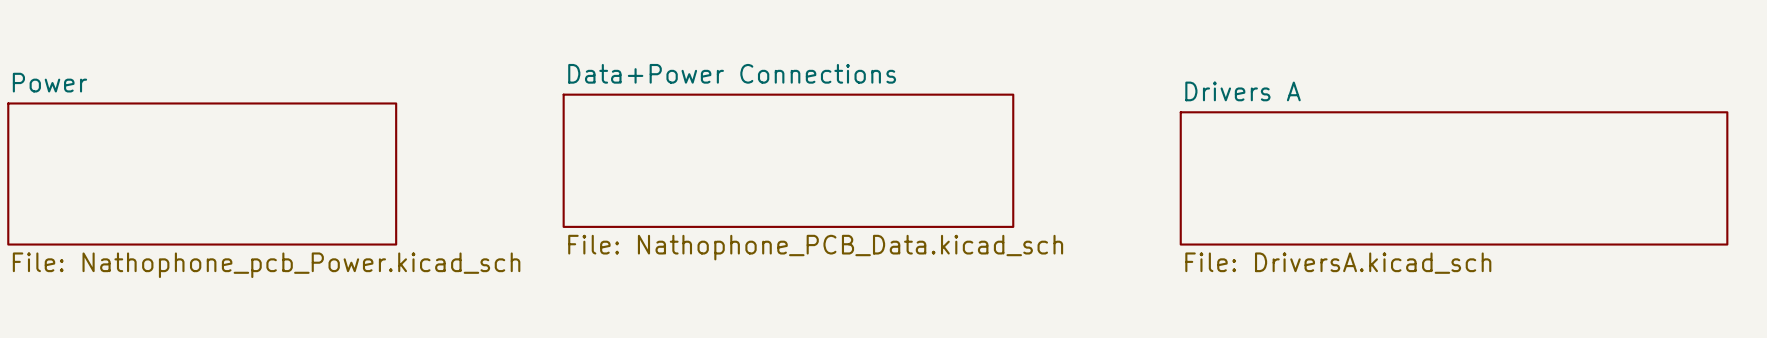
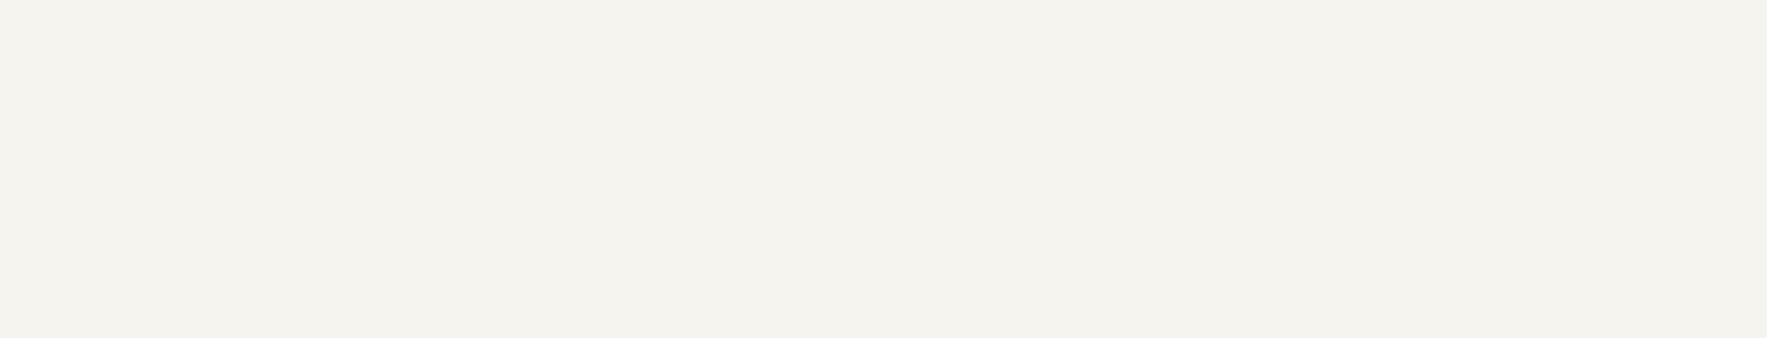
sheet Data+Power Connections: File: Nathophone_PCB_Data.kicad_sch (788, 160) -> none
sheet Power: File: Nathophone_pcb_Power.kicad_sch (202, 174) -> none
sheet Drivers A: File: DriversA.kicad_sch (1454, 178) -> none

